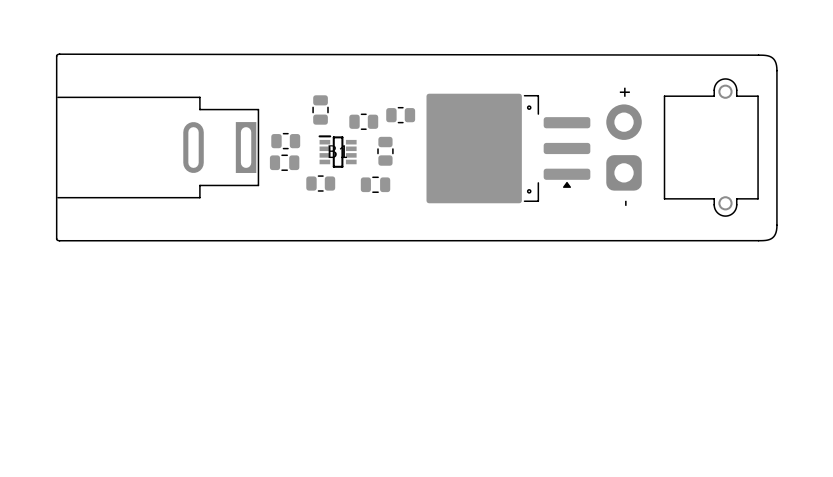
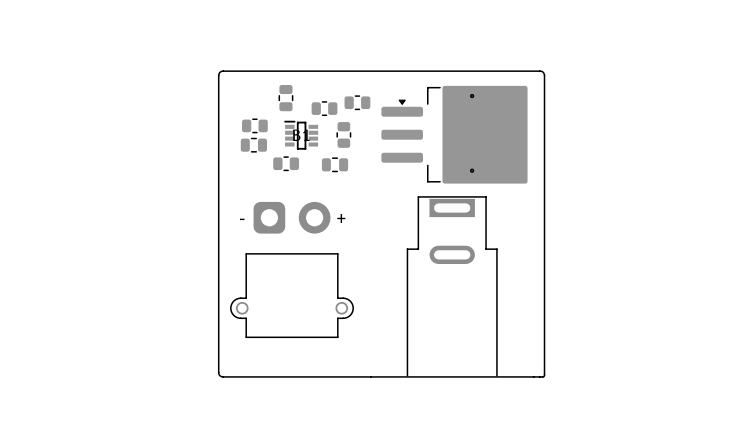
board edge: (56, 56) (59, 54) (762, 55) (773, 58) (776, 70) (776, 227) (774, 235) (768, 239) (59, 240) (56, 238) -> none
part: (157, 147) -> none
part: (682, 147) -> none
part rotation: 0° (508, 148) -> 180° (454, 134)
part: none -> (292, 269)
part: none -> (452, 286)
board edge: none -> (370, 376) (223, 376) (219, 374) (218, 75) (221, 71) (543, 72) (544, 375) (533, 376)

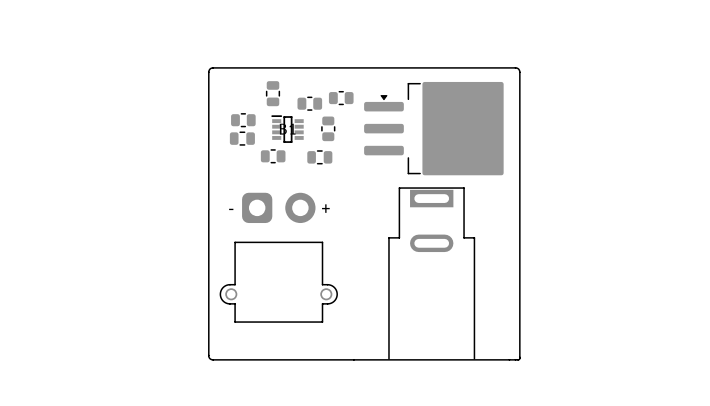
round board edge: [470, 94, 474, 98] -> none
round board edge: [470, 169, 474, 173] -> none

